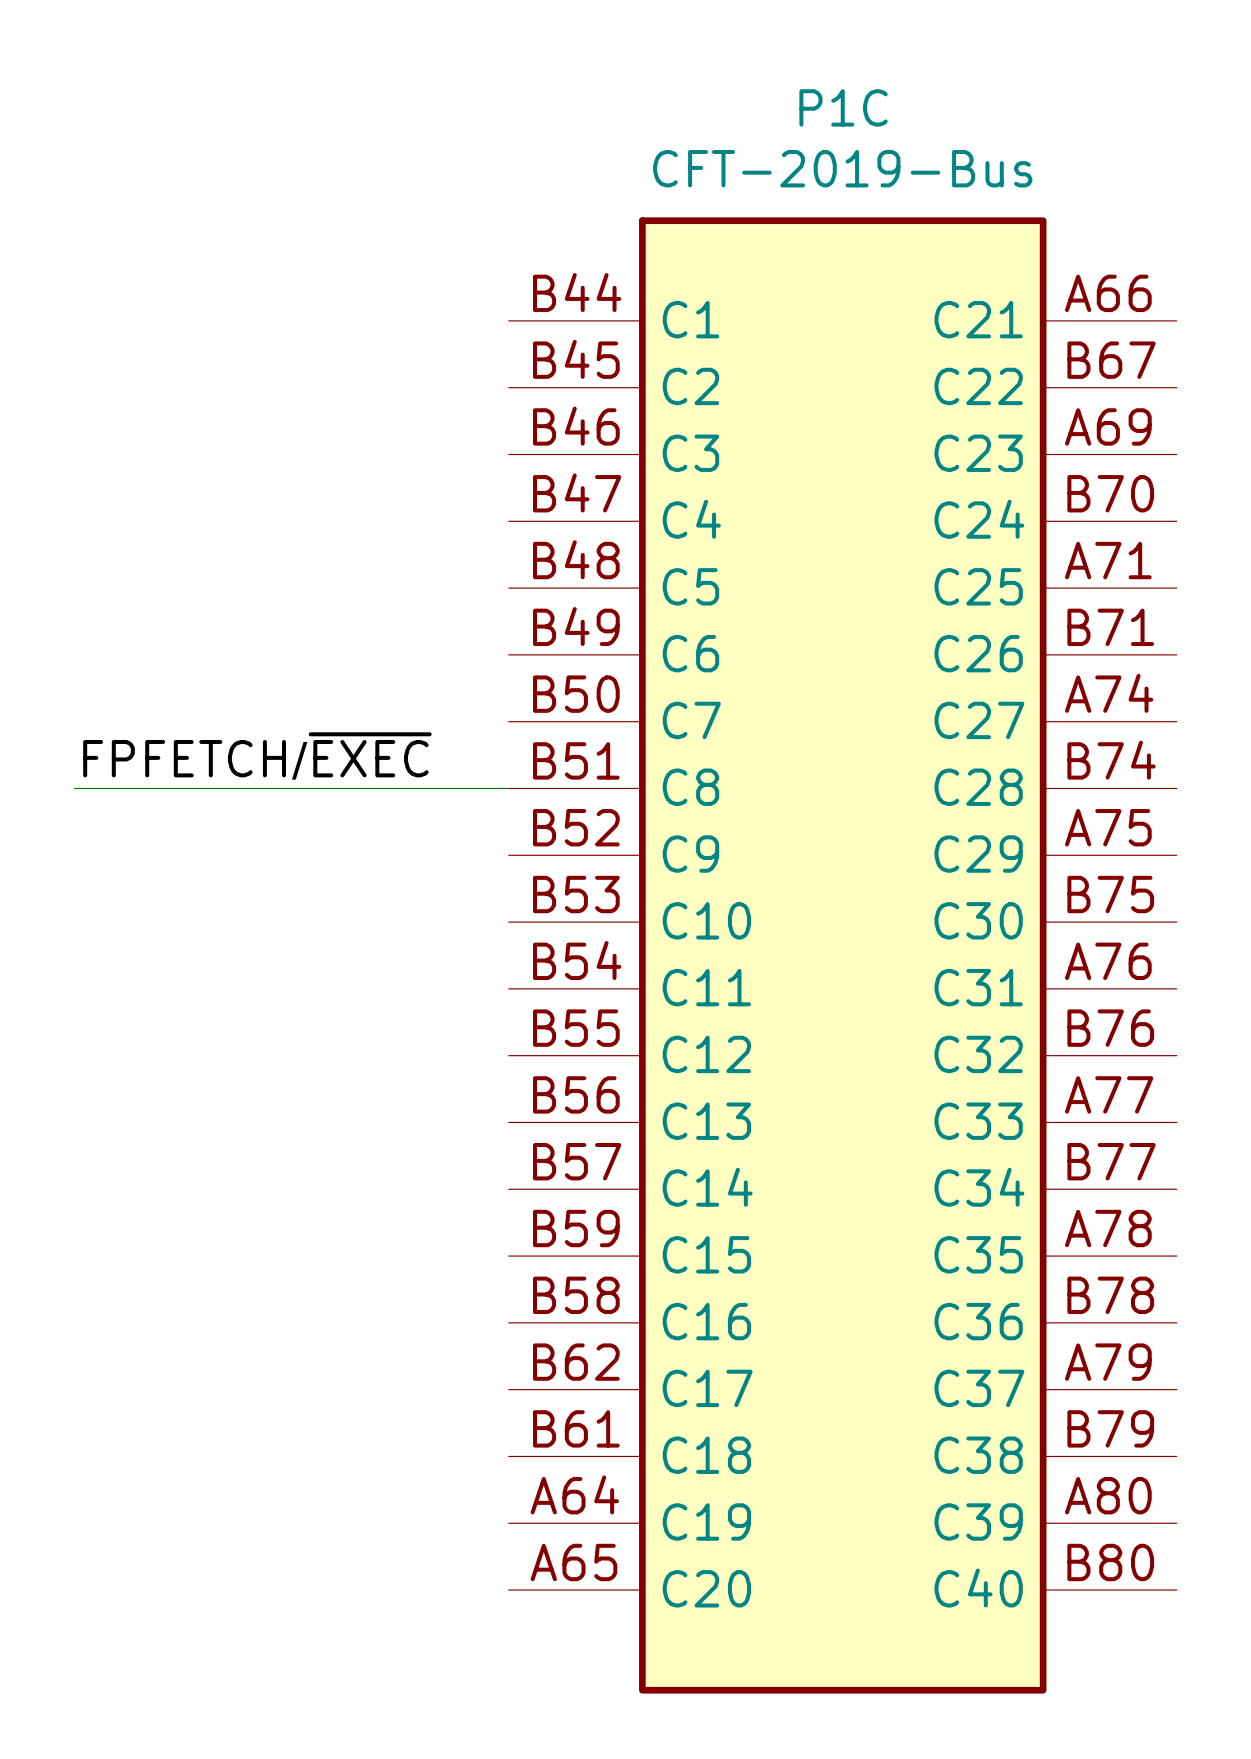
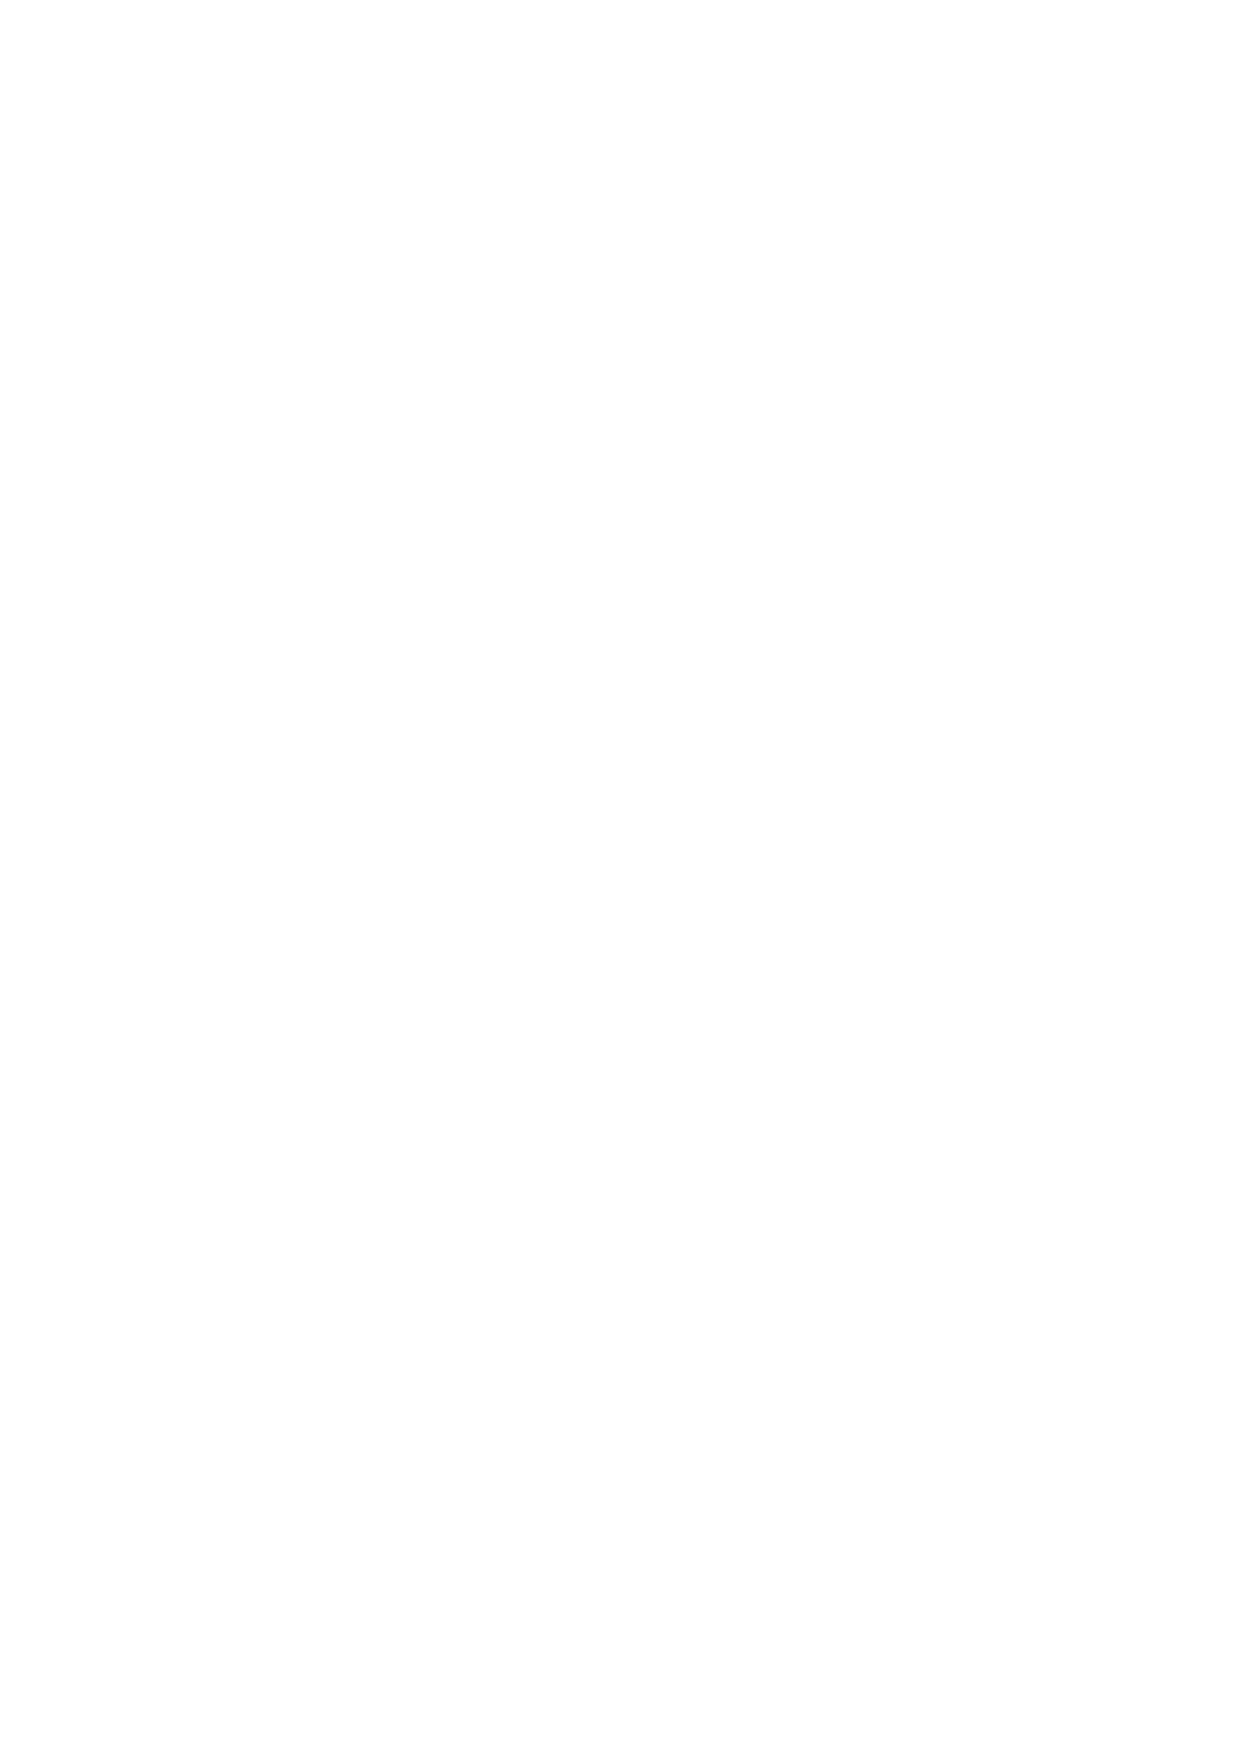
label: FPFETCH∕~{EXEC} (257, 756) -> none
wire: (74, 788) (508, 788) -> none
P1C: CFT-2019-Bus (842, 955) -> none

